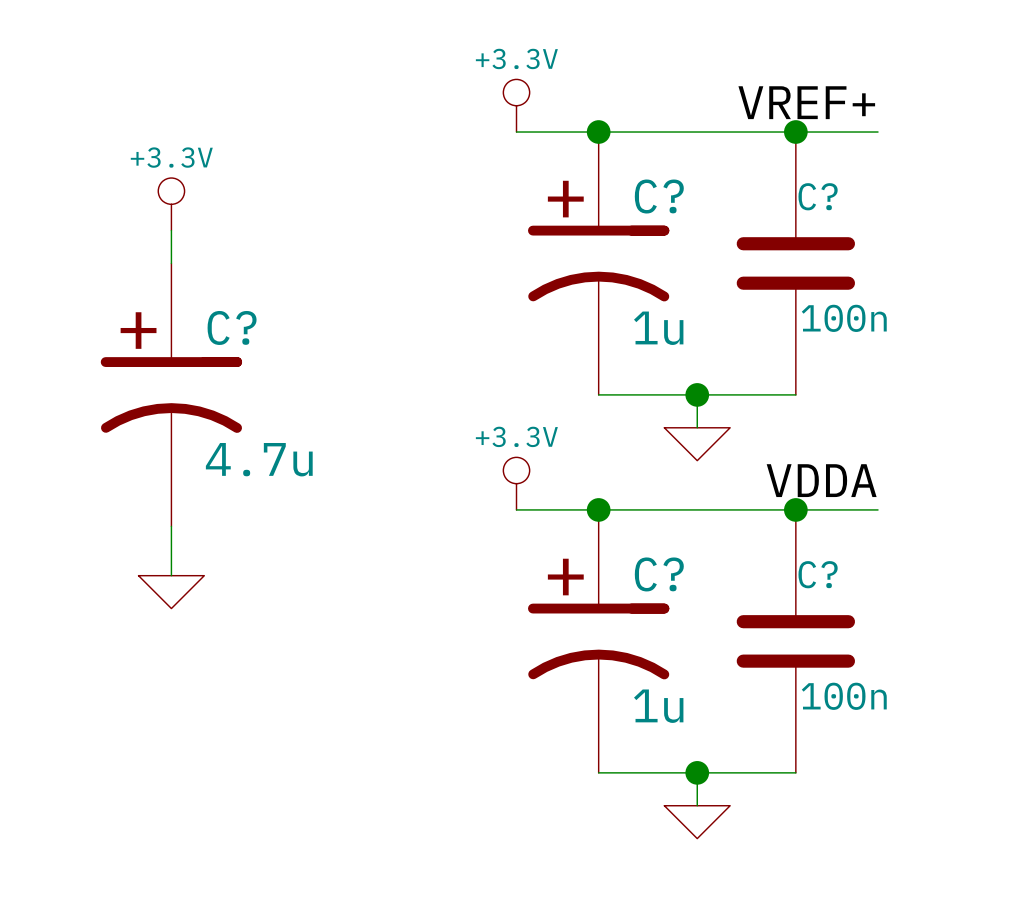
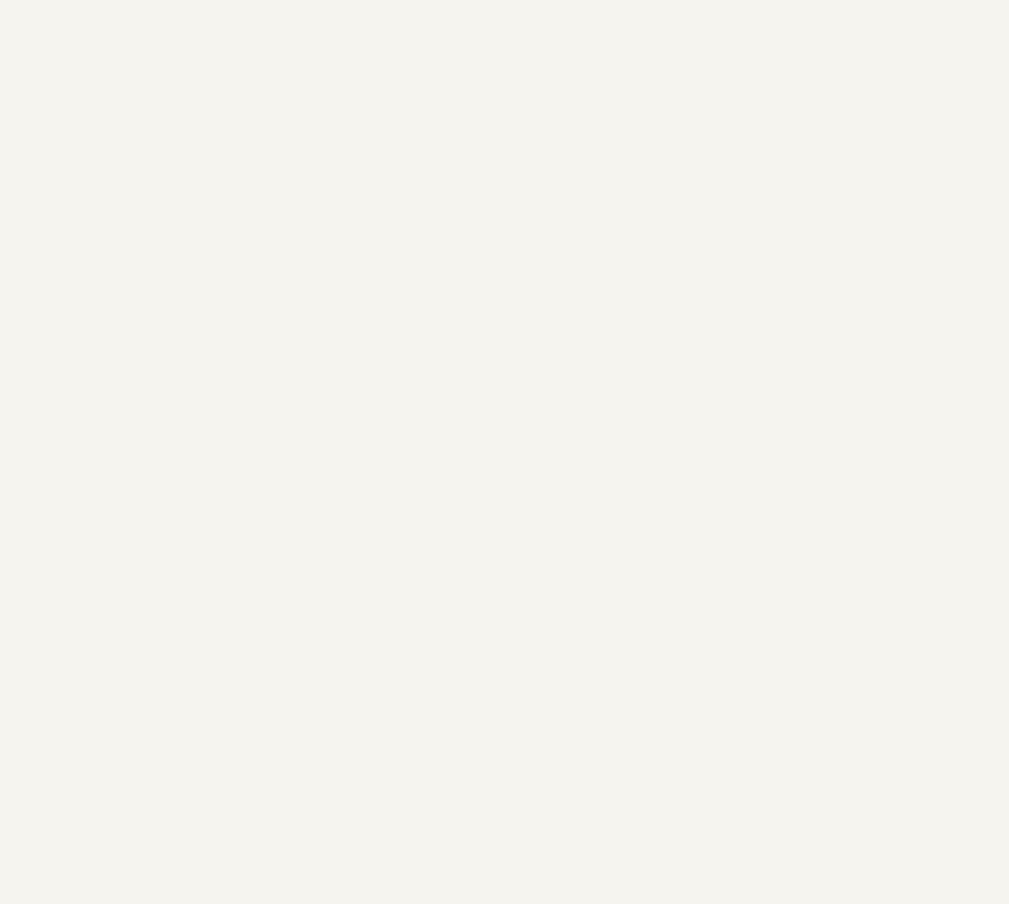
label: VREF+ (806, 102) -> none
power symbol: +3.3V (516, 105) -> none
wire: (516, 132) (878, 132) -> none
junction: (598, 132) -> none
junction: (795, 132) -> none
power symbol: +3.3V (171, 204) -> none
wire: (171, 230) (171, 263) -> none
C?: 1u (598, 263) -> none
C?: 100n (795, 263) -> none
C?: 4.7u (171, 394) -> none
wire: (598, 394) (795, 394) -> none
wire: (697, 394) (697, 427) -> none
junction: (697, 394) -> none
power symbol: (697, 444) -> none
label: VDDA (821, 480) -> none
power symbol: +3.3V (516, 483) -> none
wire: (516, 509) (878, 509) -> none
junction: (598, 509) -> none
junction: (795, 509) -> none
wire: (171, 526) (171, 575) -> none
power symbol: (171, 592) -> none
C?: 1u (598, 641) -> none
C?: 100n (795, 641) -> none
wire: (598, 772) (795, 772) -> none
wire: (697, 772) (697, 805) -> none
junction: (697, 772) -> none
power symbol: (697, 822) -> none

